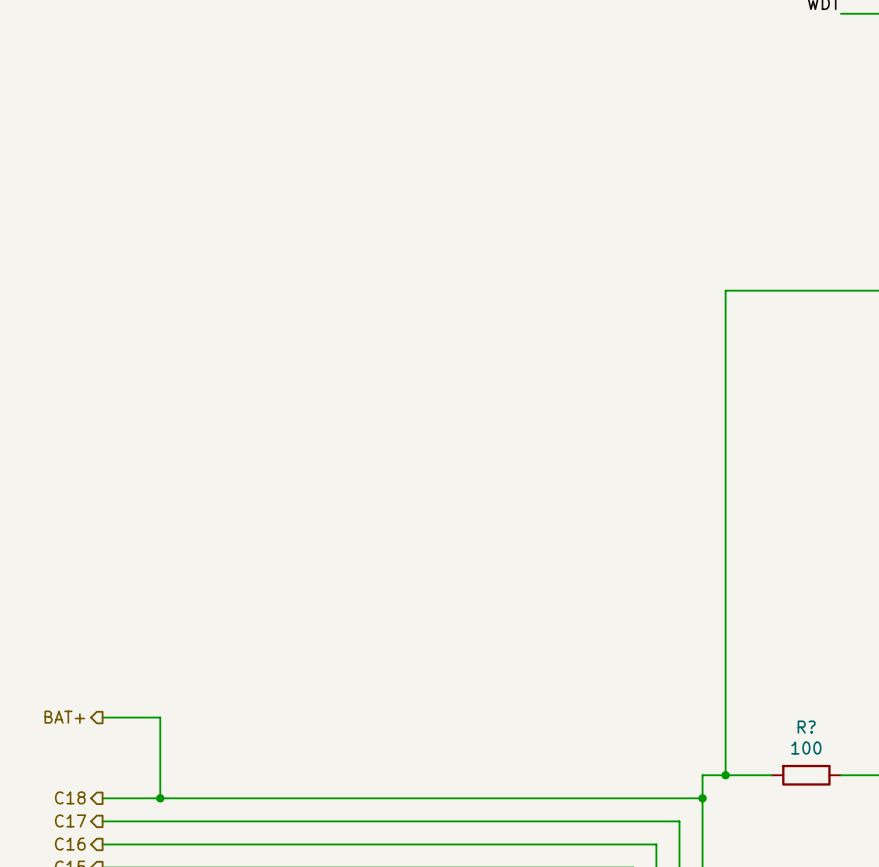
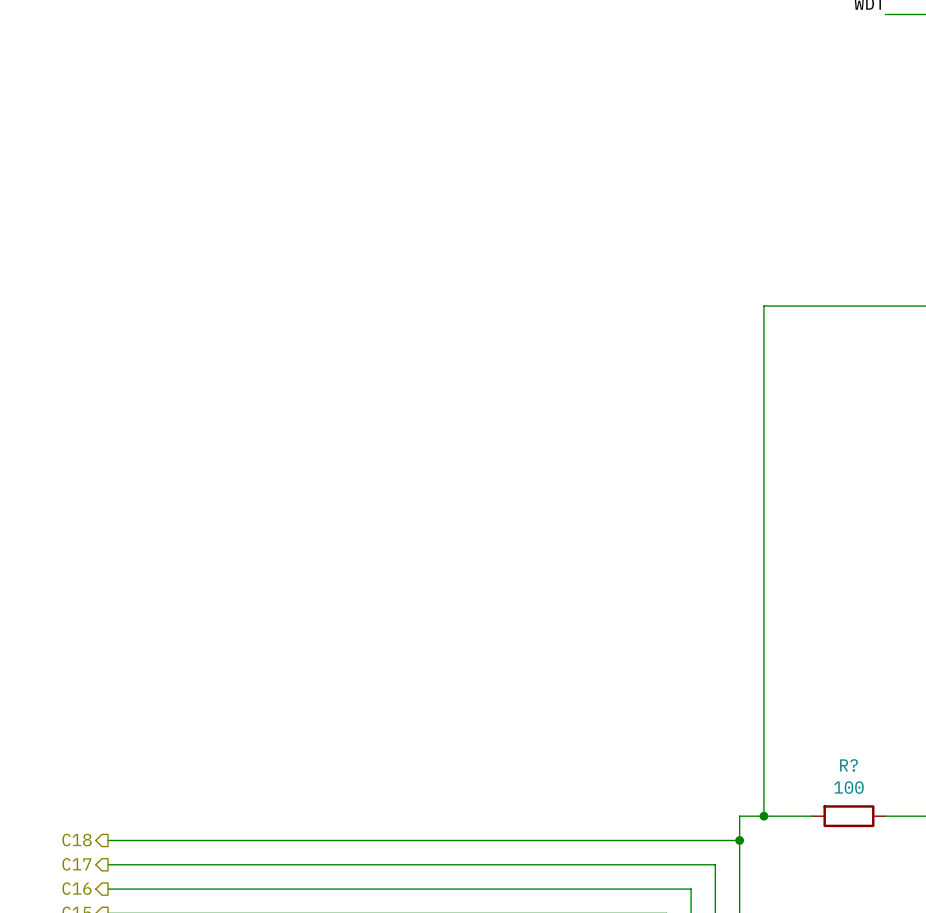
hierarchical label: BAT+ (64, 717) -> none
wire: (102, 717) (160, 717) (160, 798) -> none
junction: (160, 798) -> none

